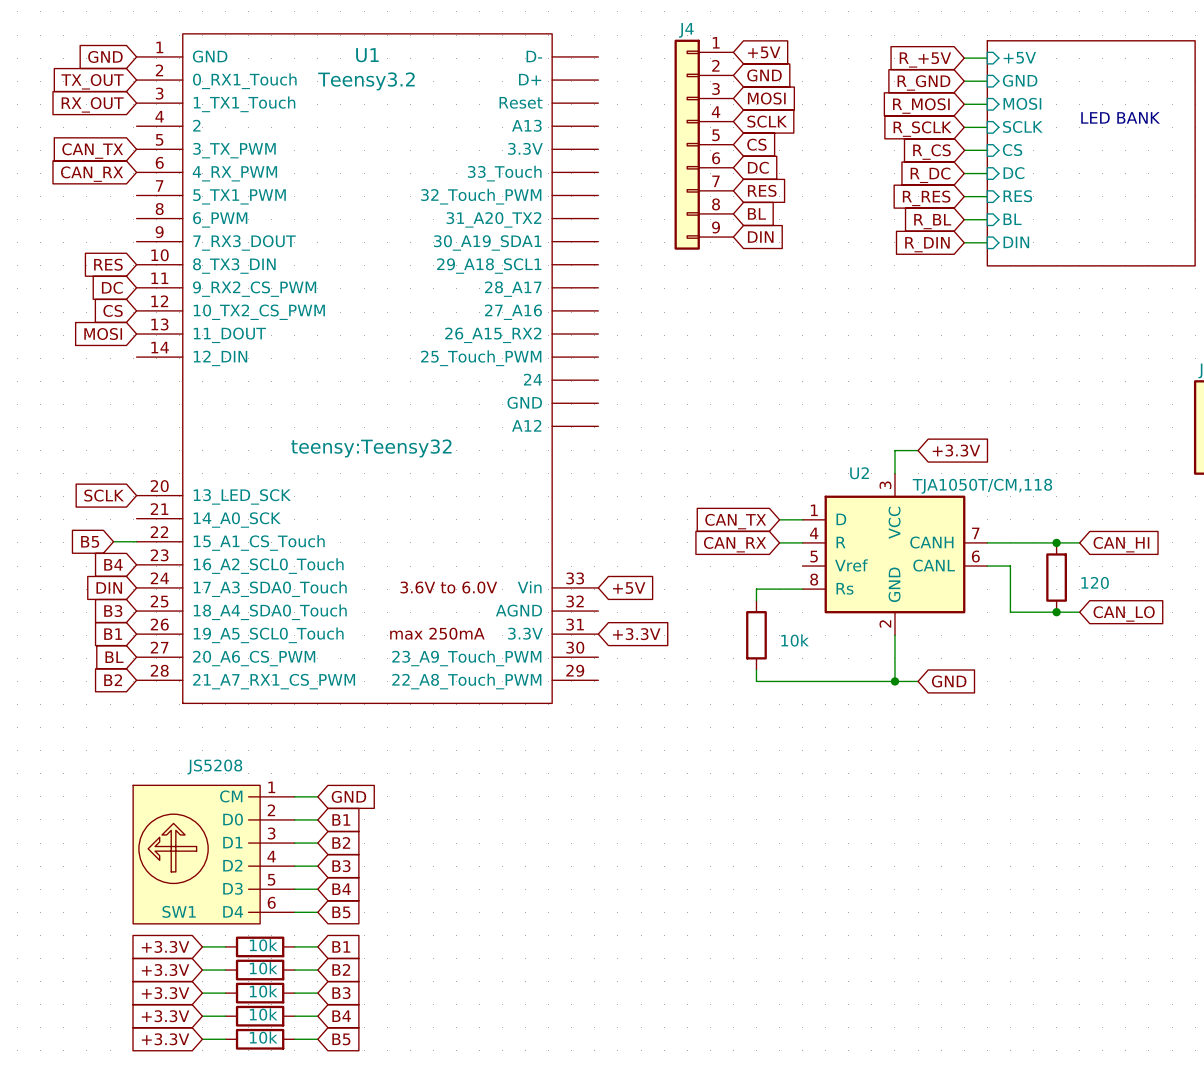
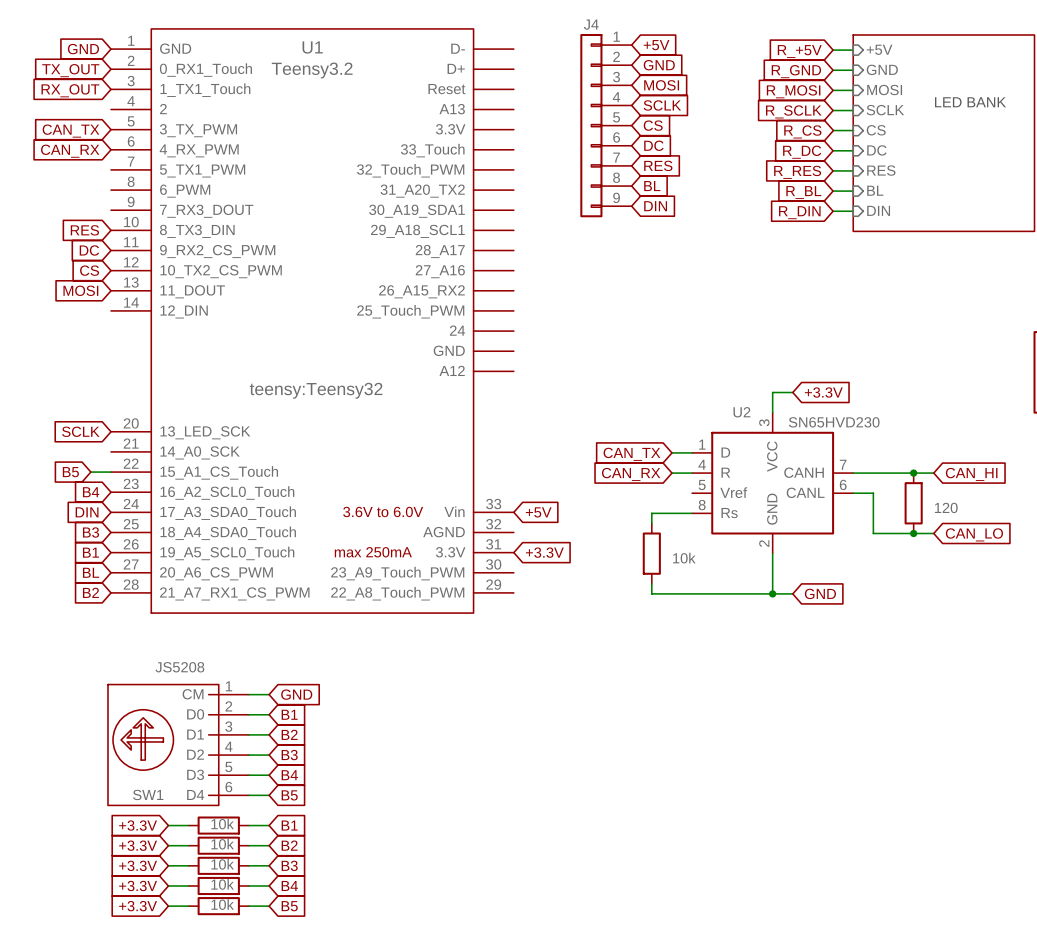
U2 value: TJA1050T/CM,118 (982, 486) -> SN65HVD230 (834, 422)

